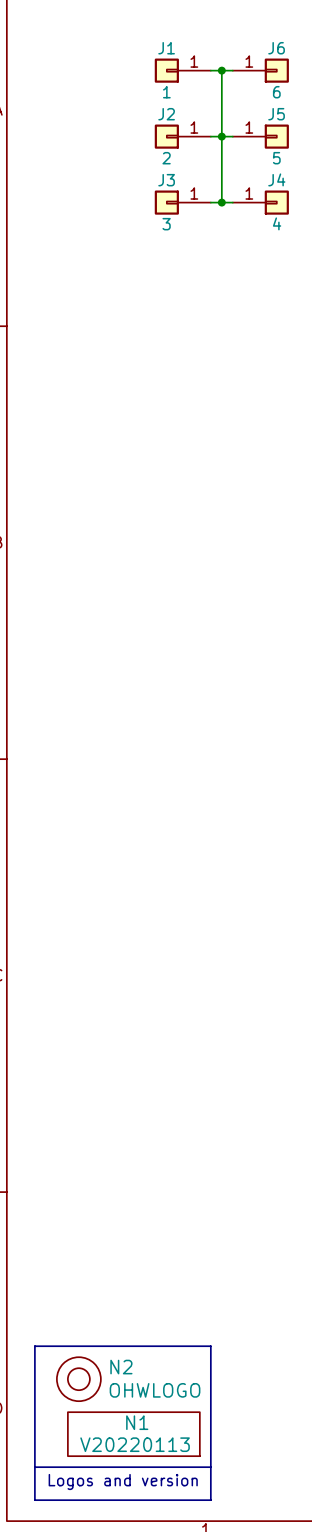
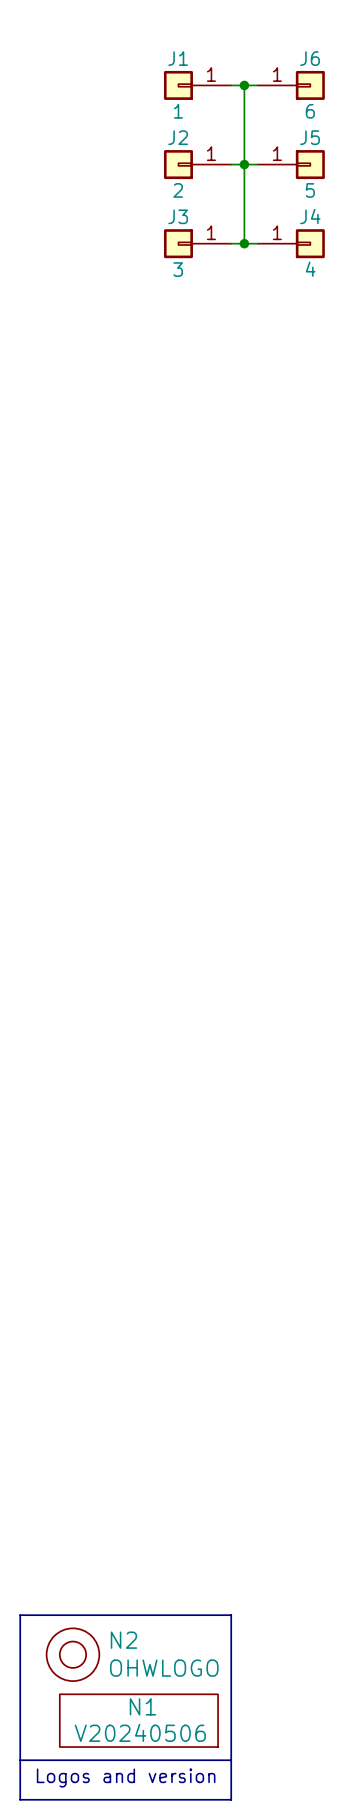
N1 value: V20220113 (135, 1444) -> V20240506 (140, 1732)

